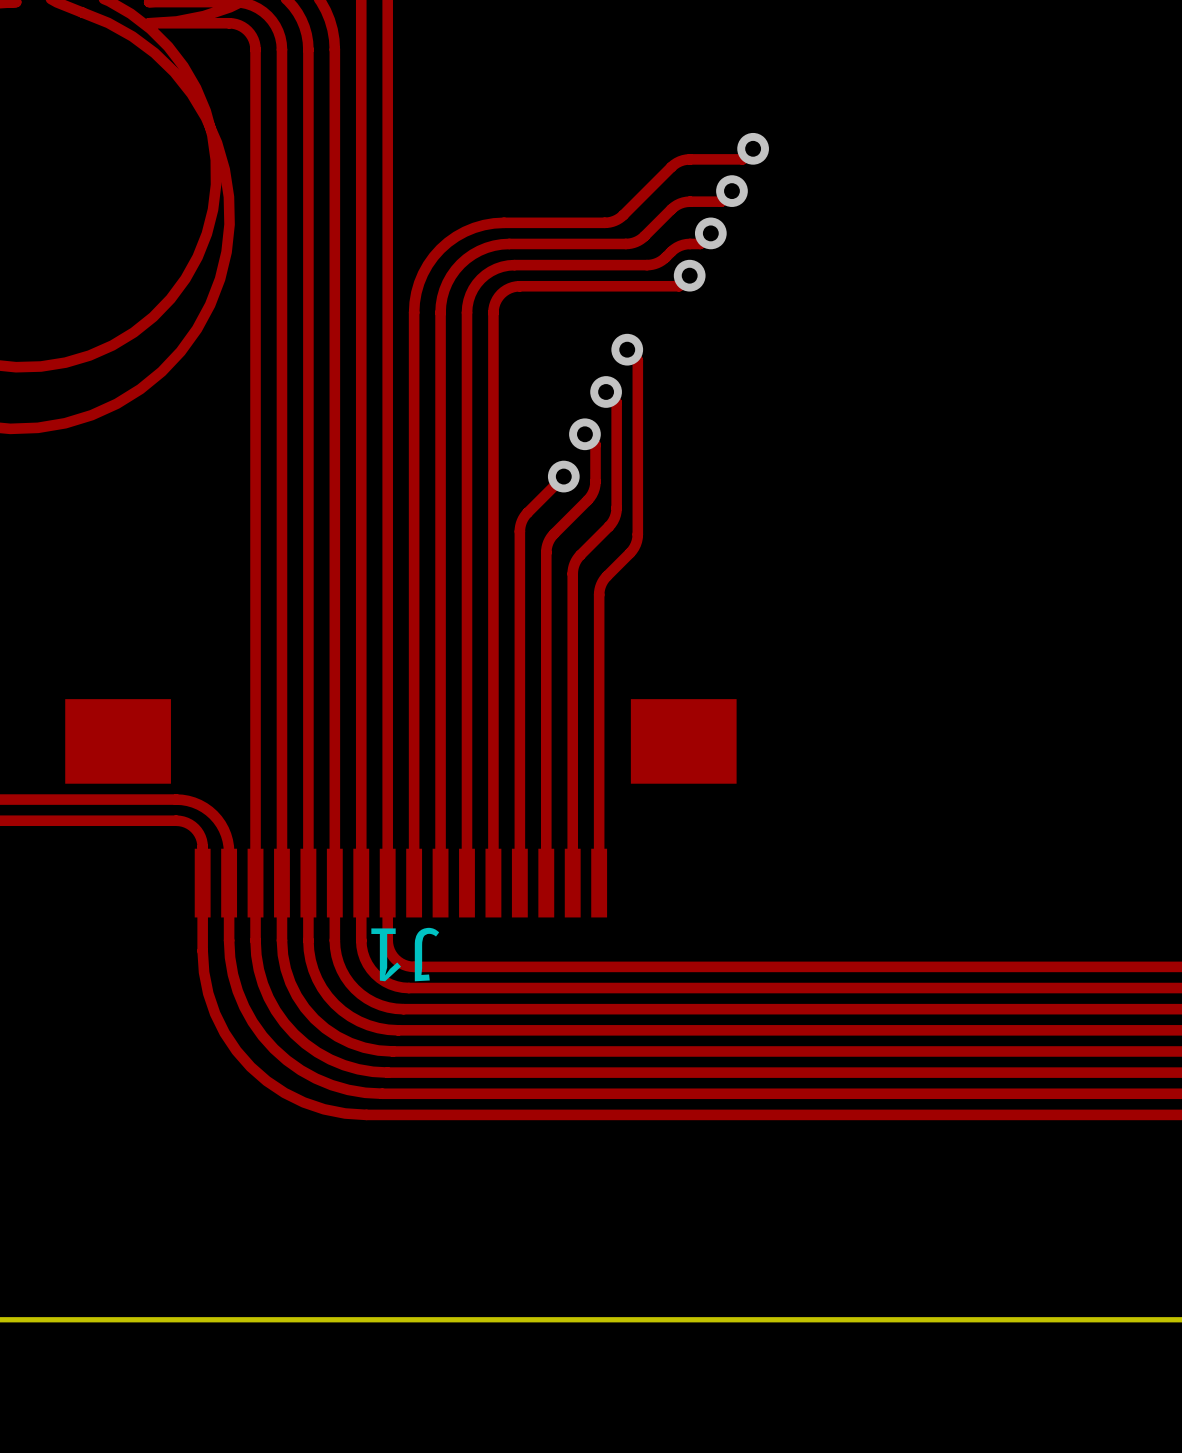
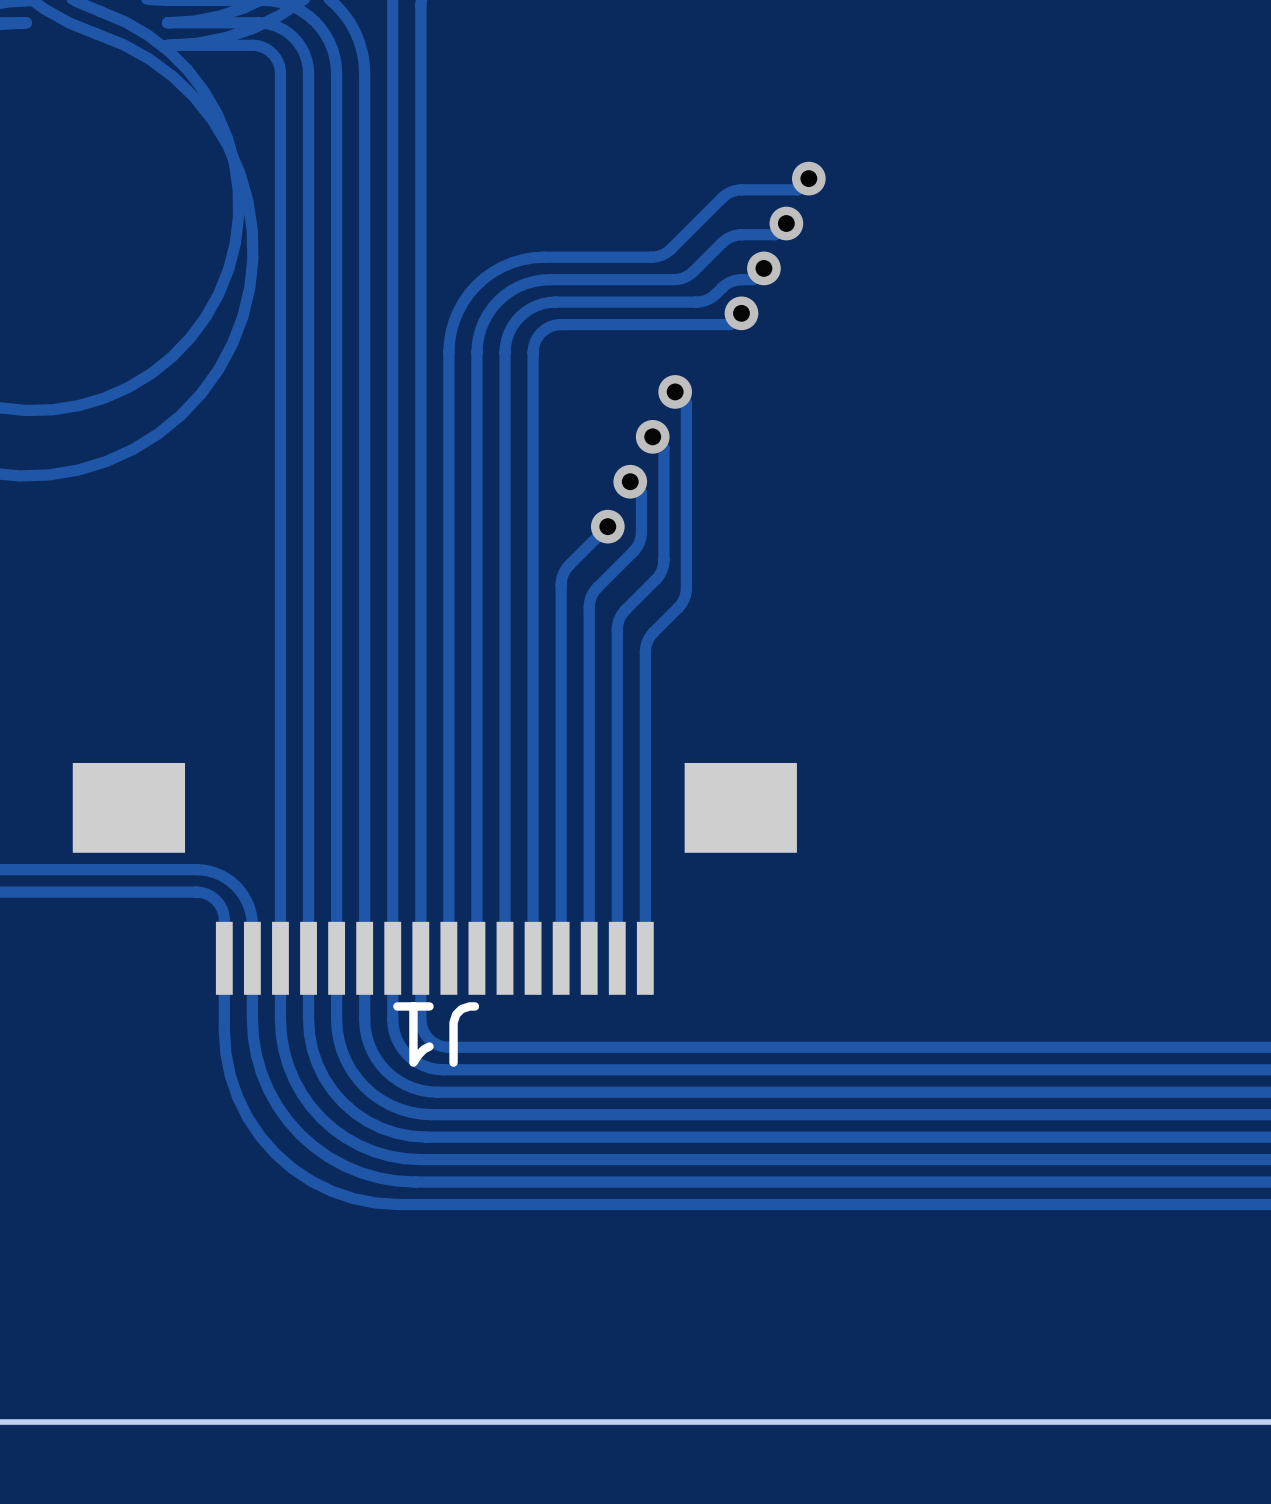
J1 footprint: [65, 699, 737, 918] -> [72, 762, 797, 995]

